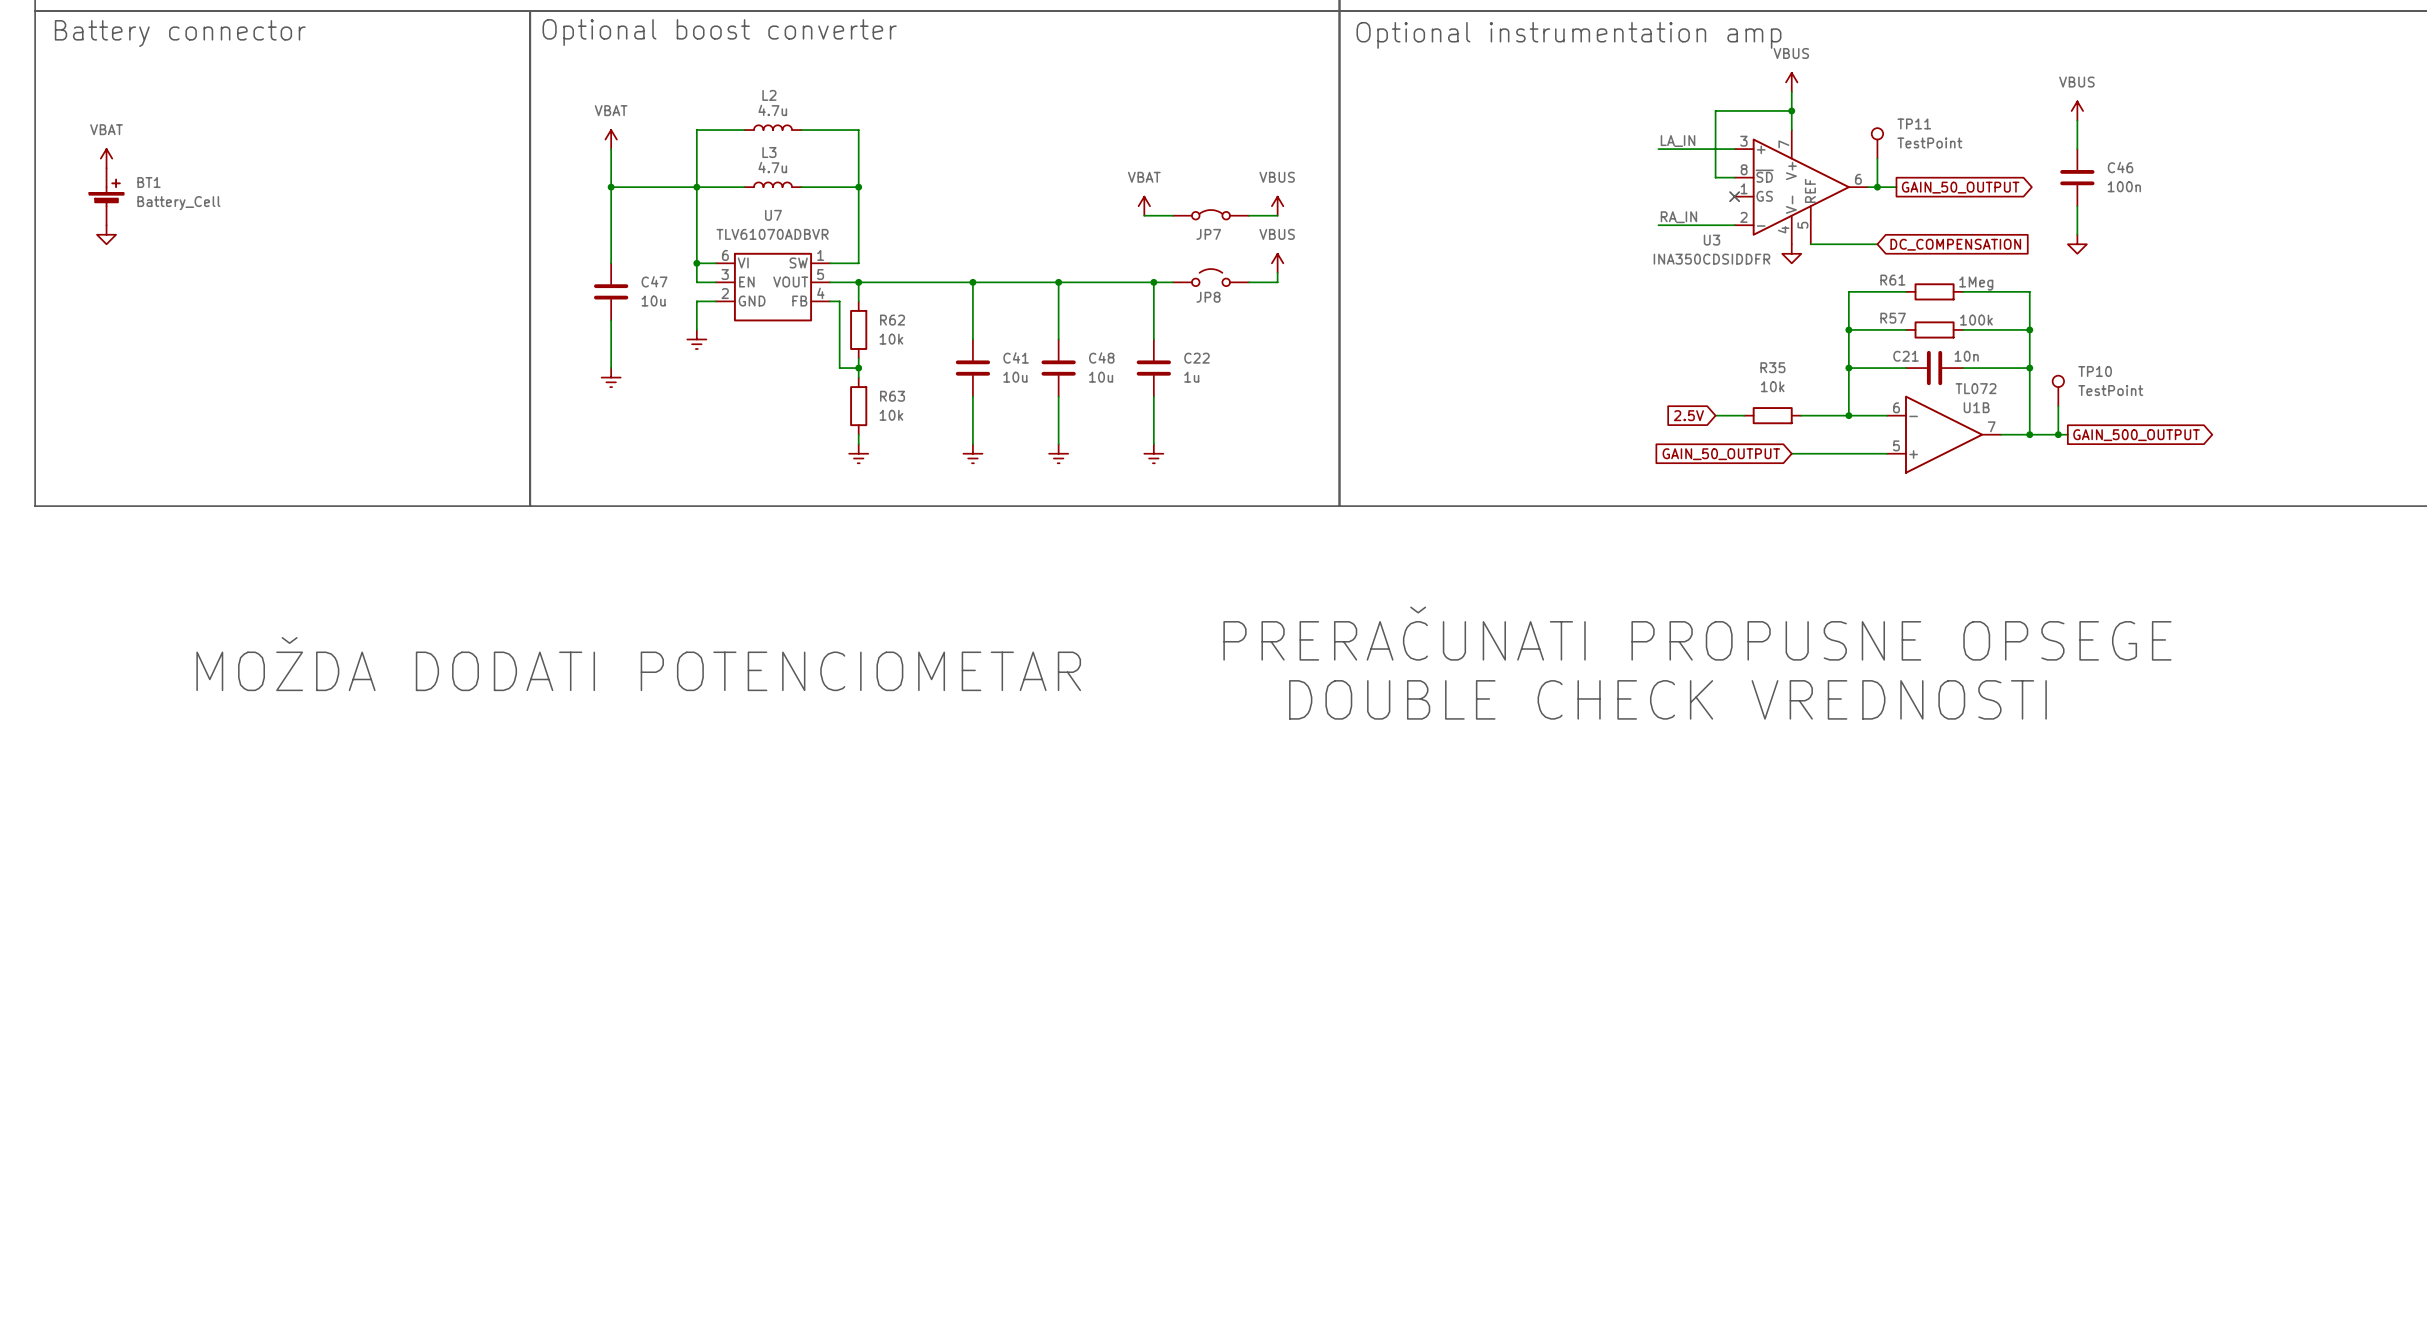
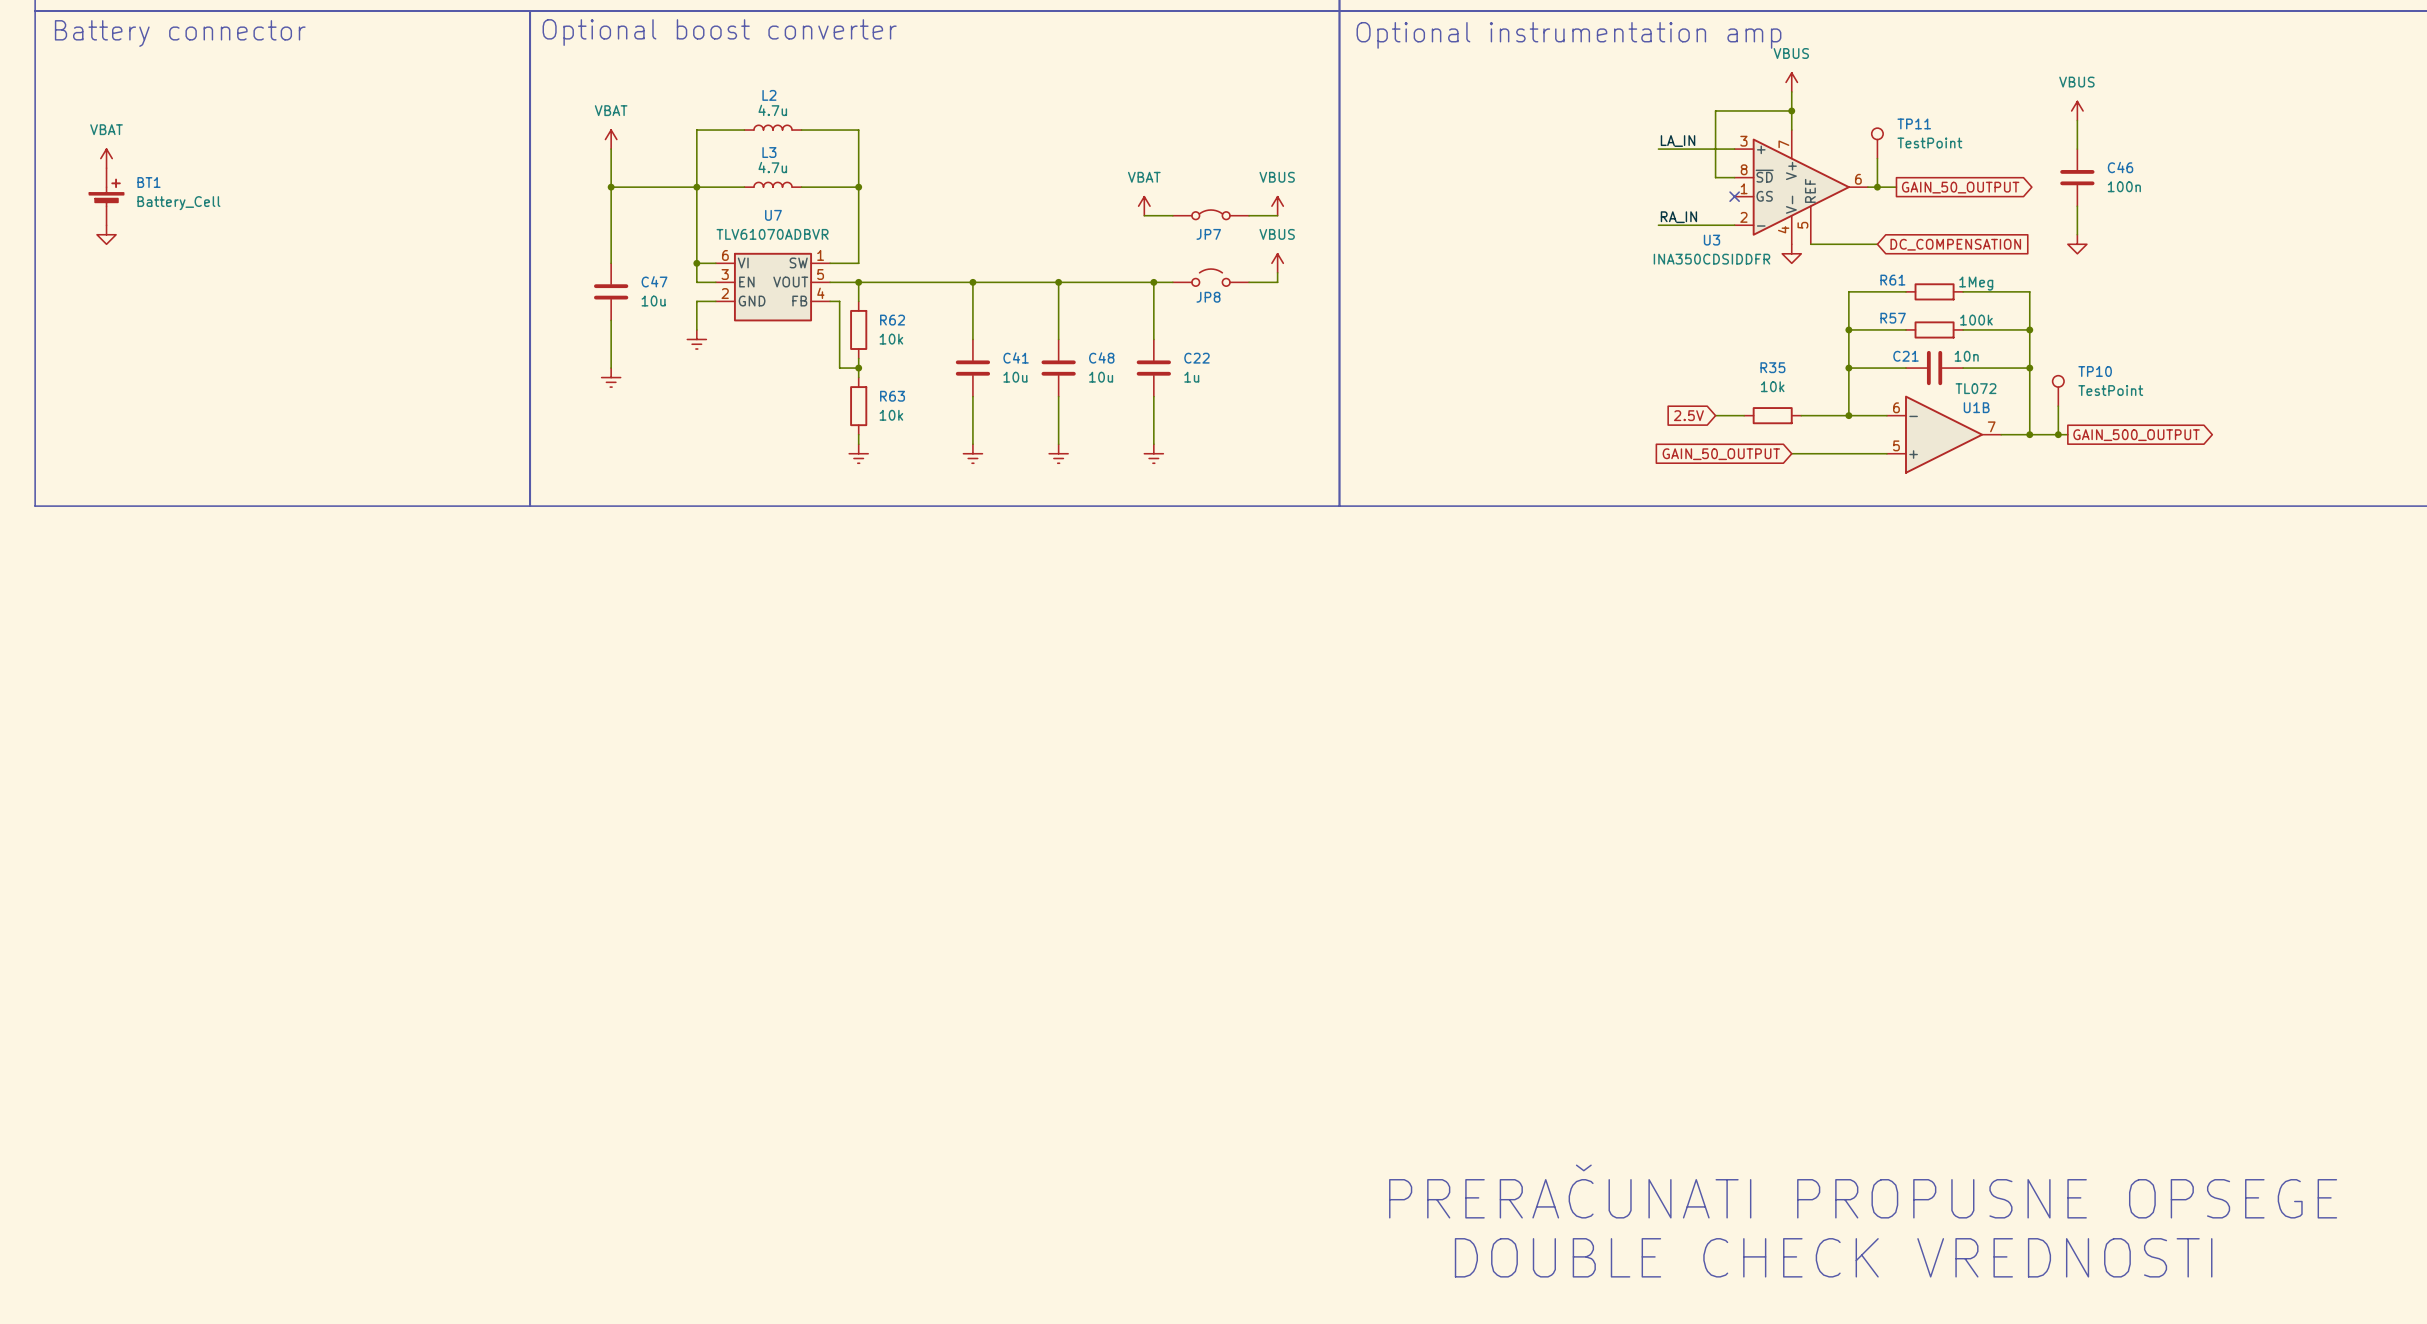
text: PRERAČUNATI PROPUSNE OPSEGE (1697, 633) -> none
text: MOŽDA DODATI POTENCIOMETAR (638, 664) -> none
text: DOUBLE CHECK VREDNOSTI (1667, 699) -> none
text: none -> PRERAČUNATI PROPUSNE OPSEGE (1863, 1191)
text: none -> DOUBLE CHECK VREDNOSTI (1833, 1257)

